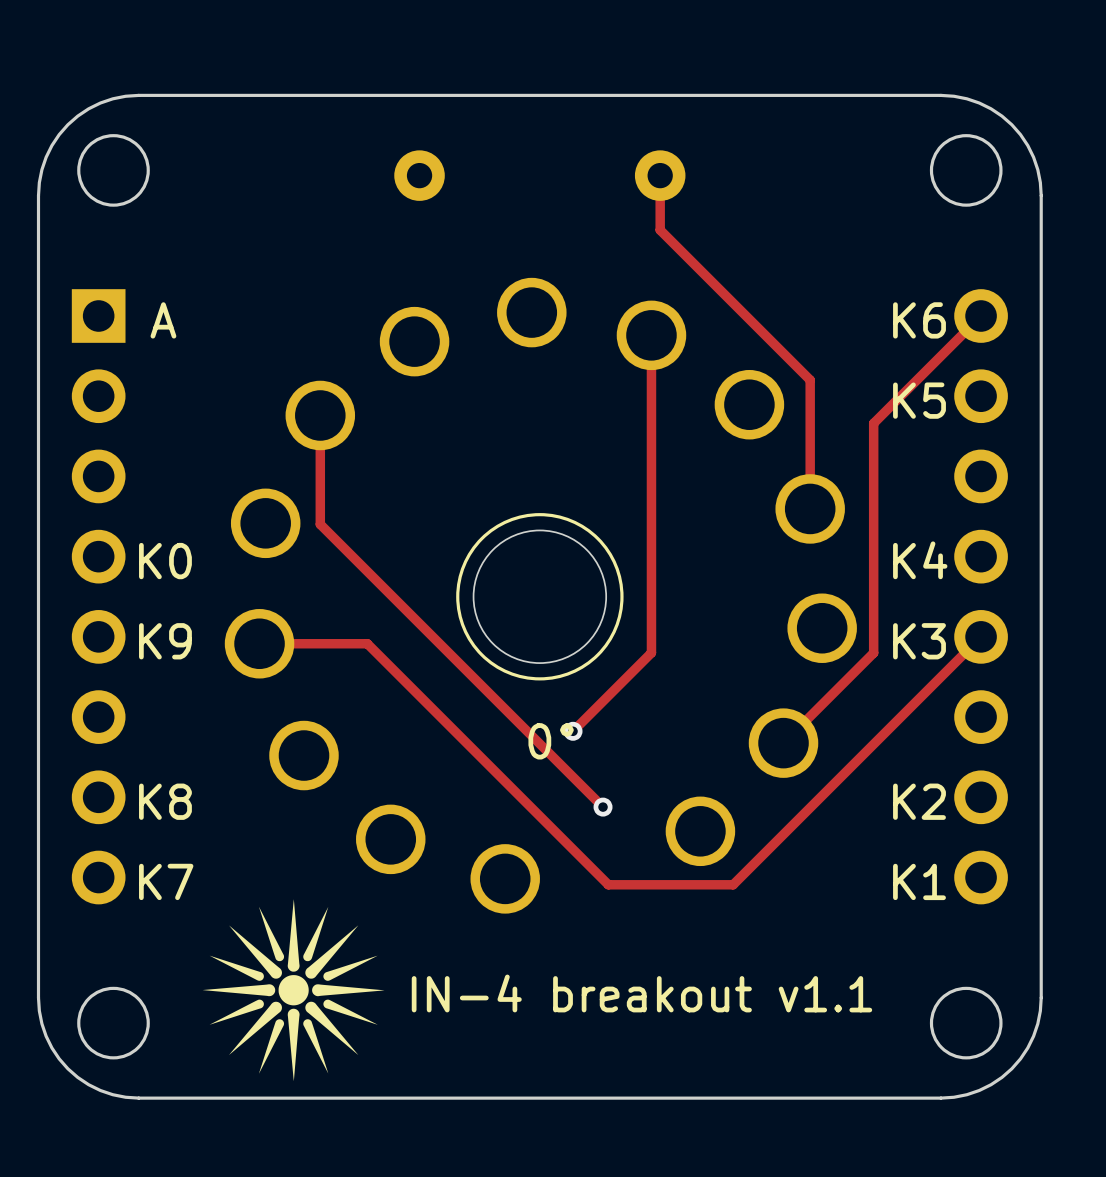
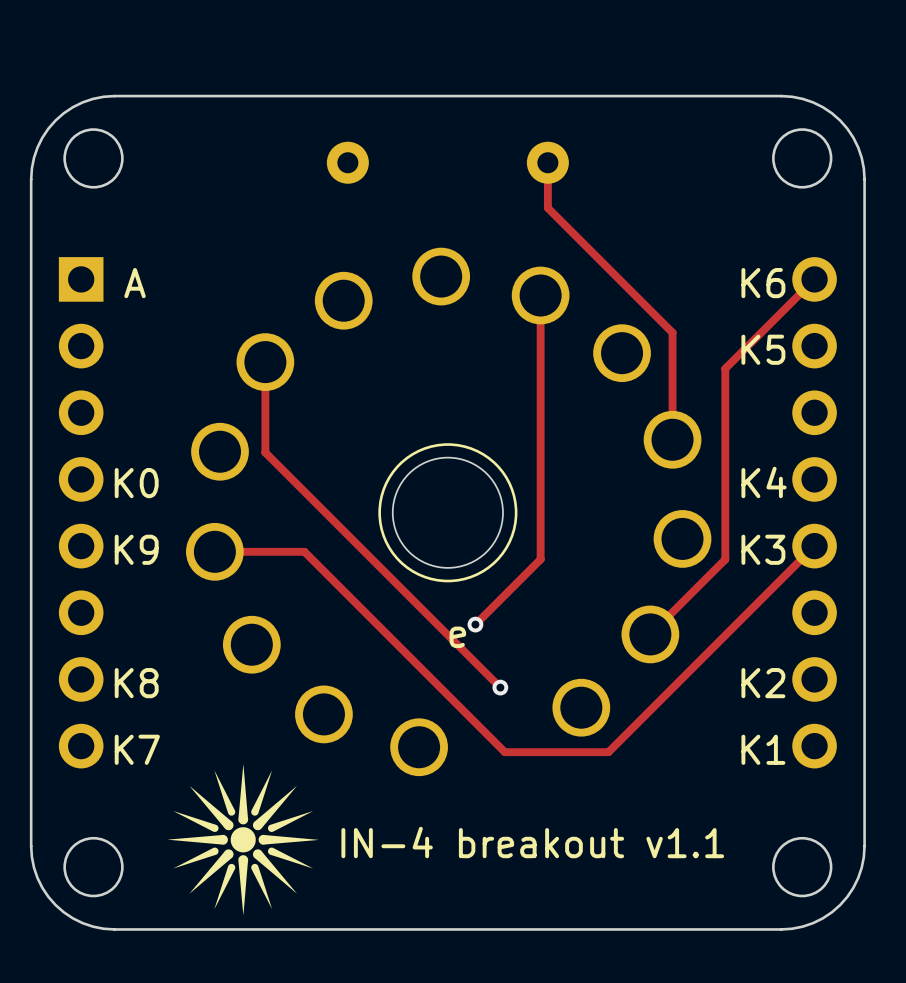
text: 0° (551, 741) -> e (457, 637)

